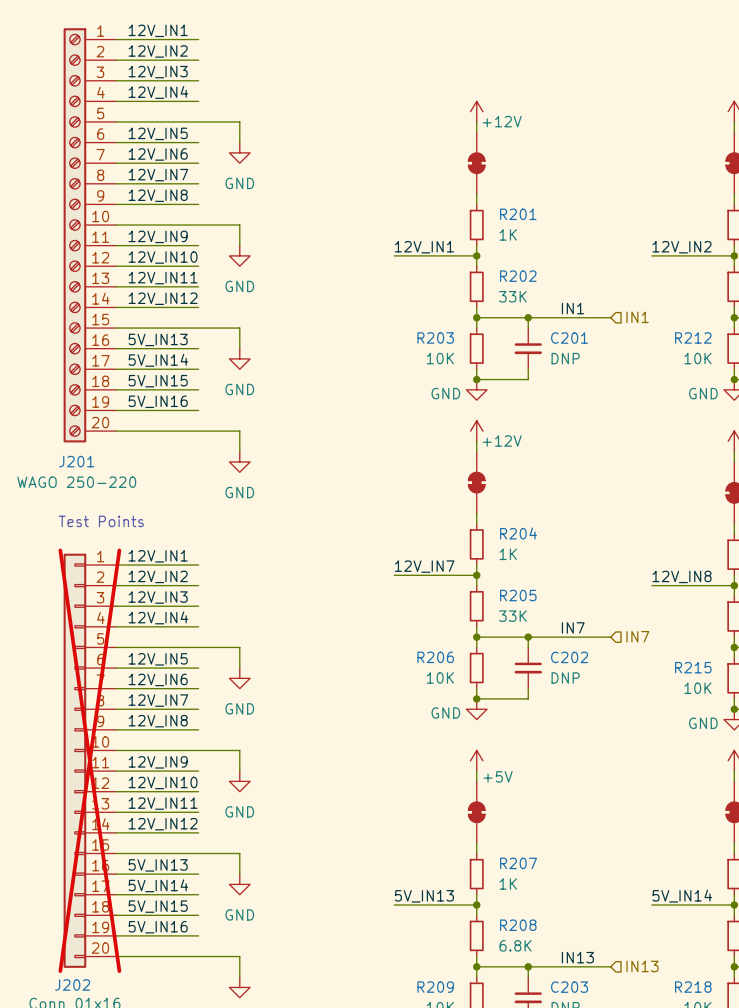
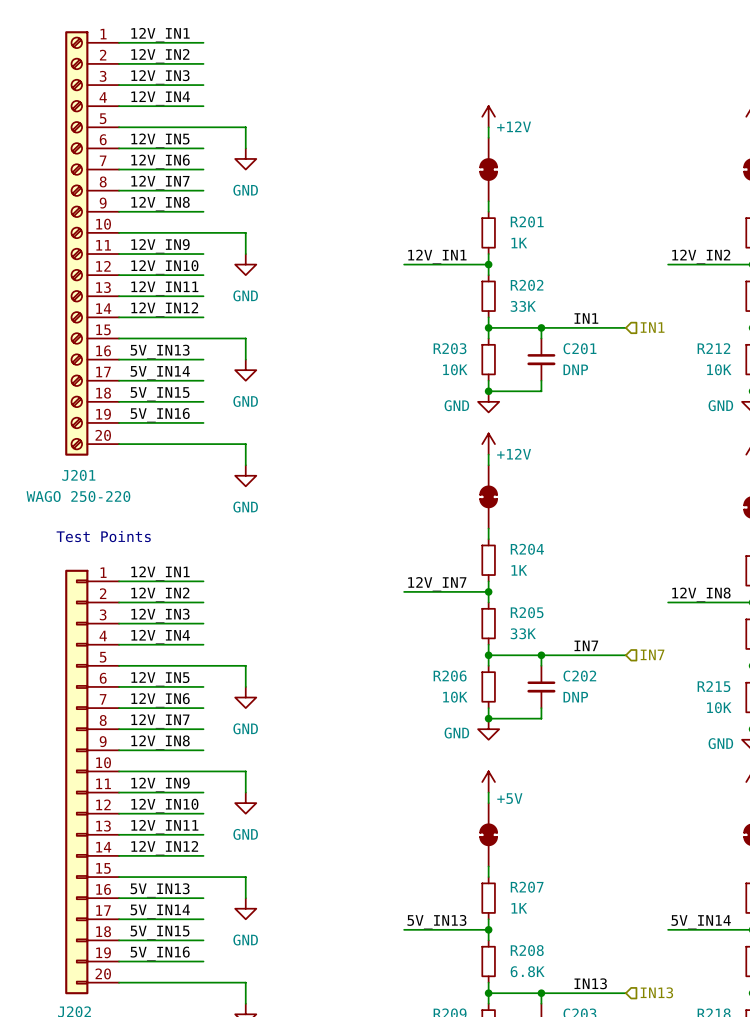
J202 do-not-place cross: (89, 760) -> none

